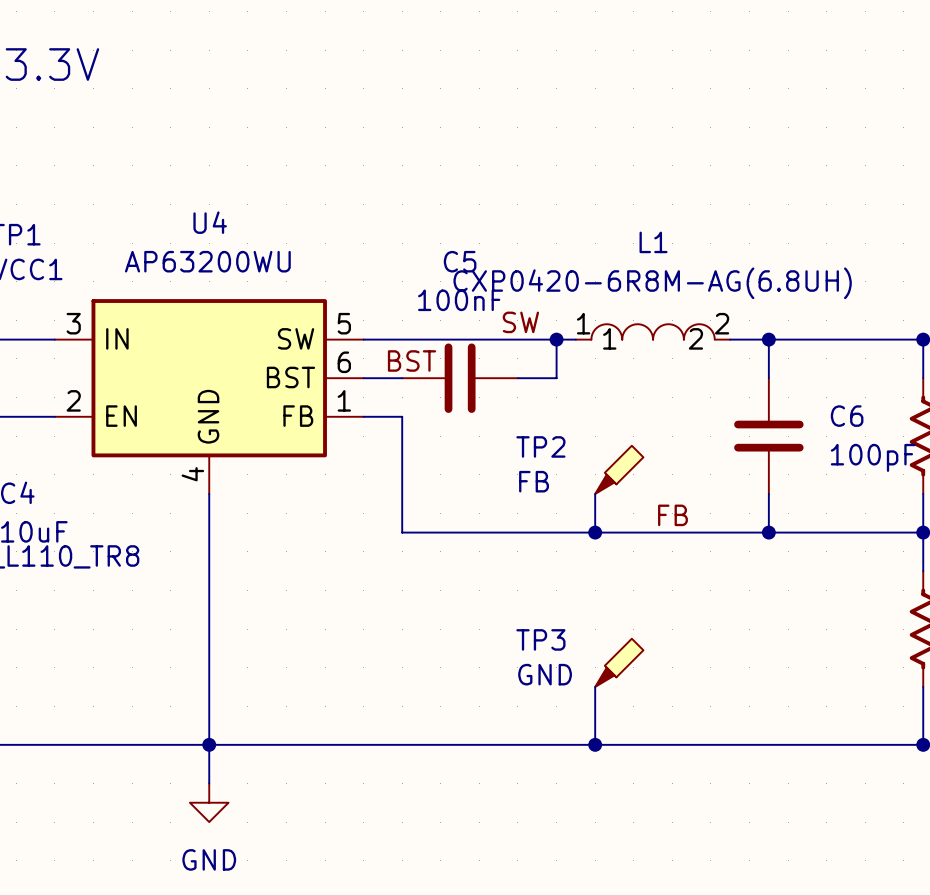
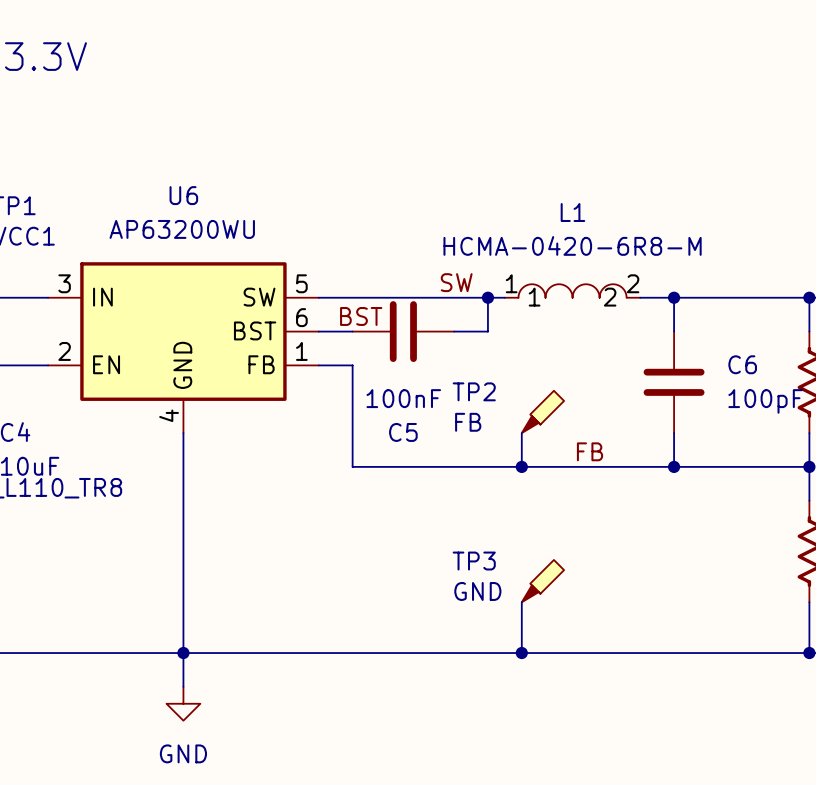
U4 name: U4 (210, 222) -> U6 (183, 195)
C5 name position: C5 (460, 261) -> C5 (403, 432)
L1 value: CXP0420-6R8M-AG(6.8UH) (652, 283) -> HCMA-0420-6R8-M (572, 245)
C5 value position: 100nF (460, 300) -> 100nF (403, 398)

